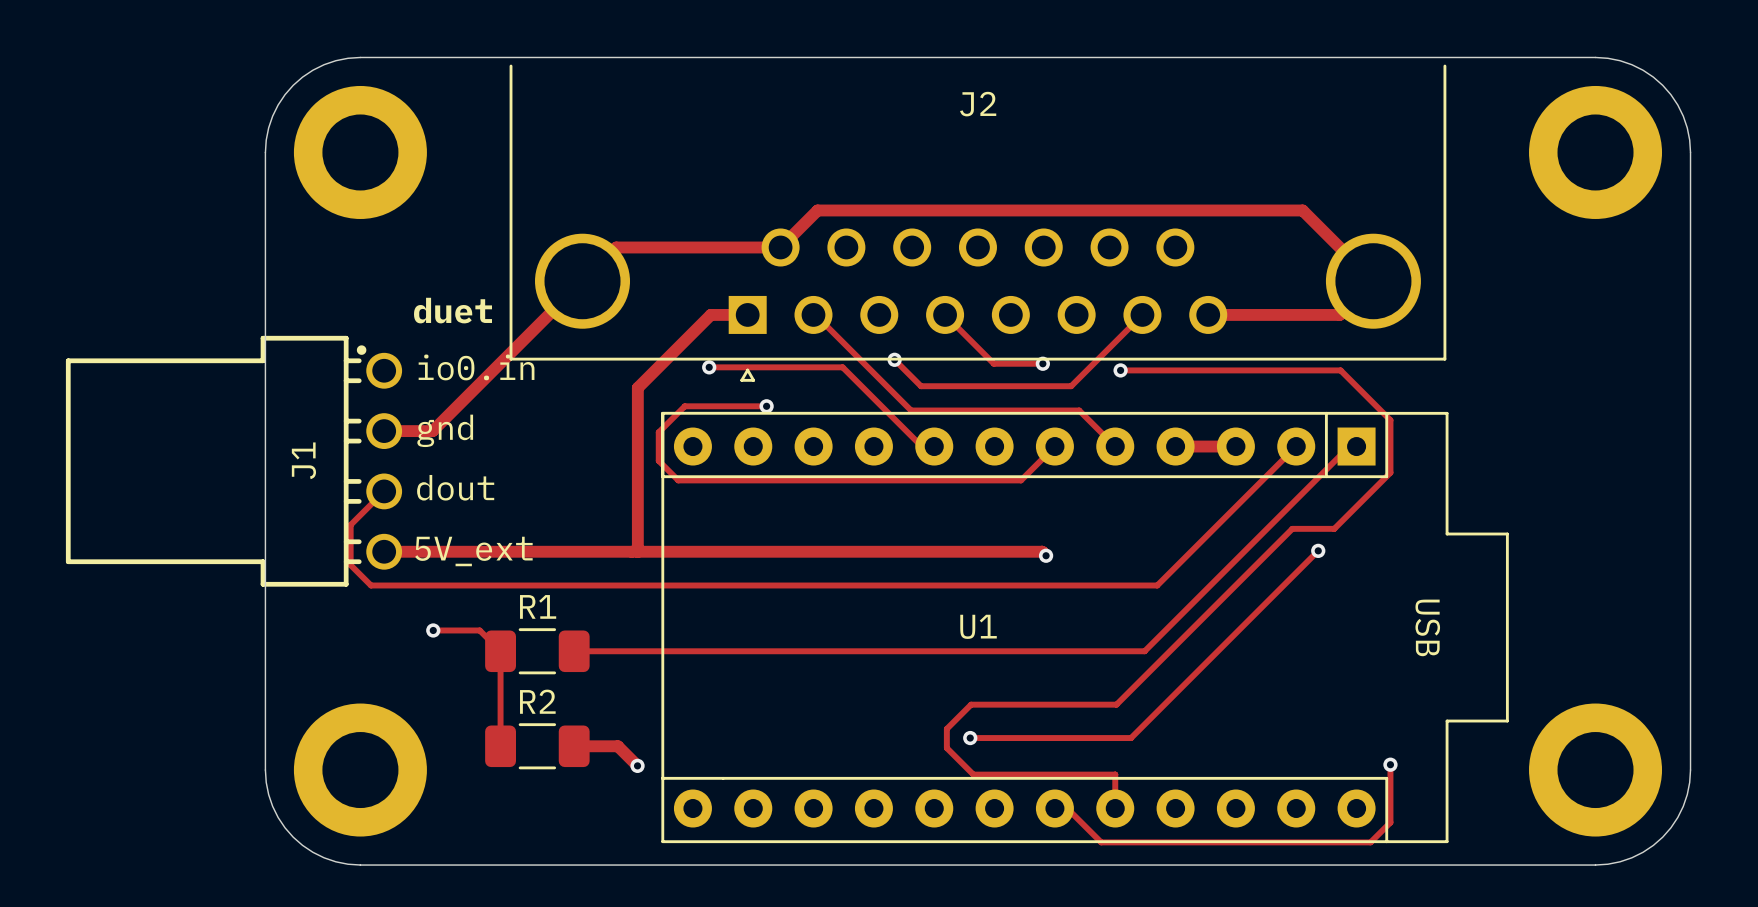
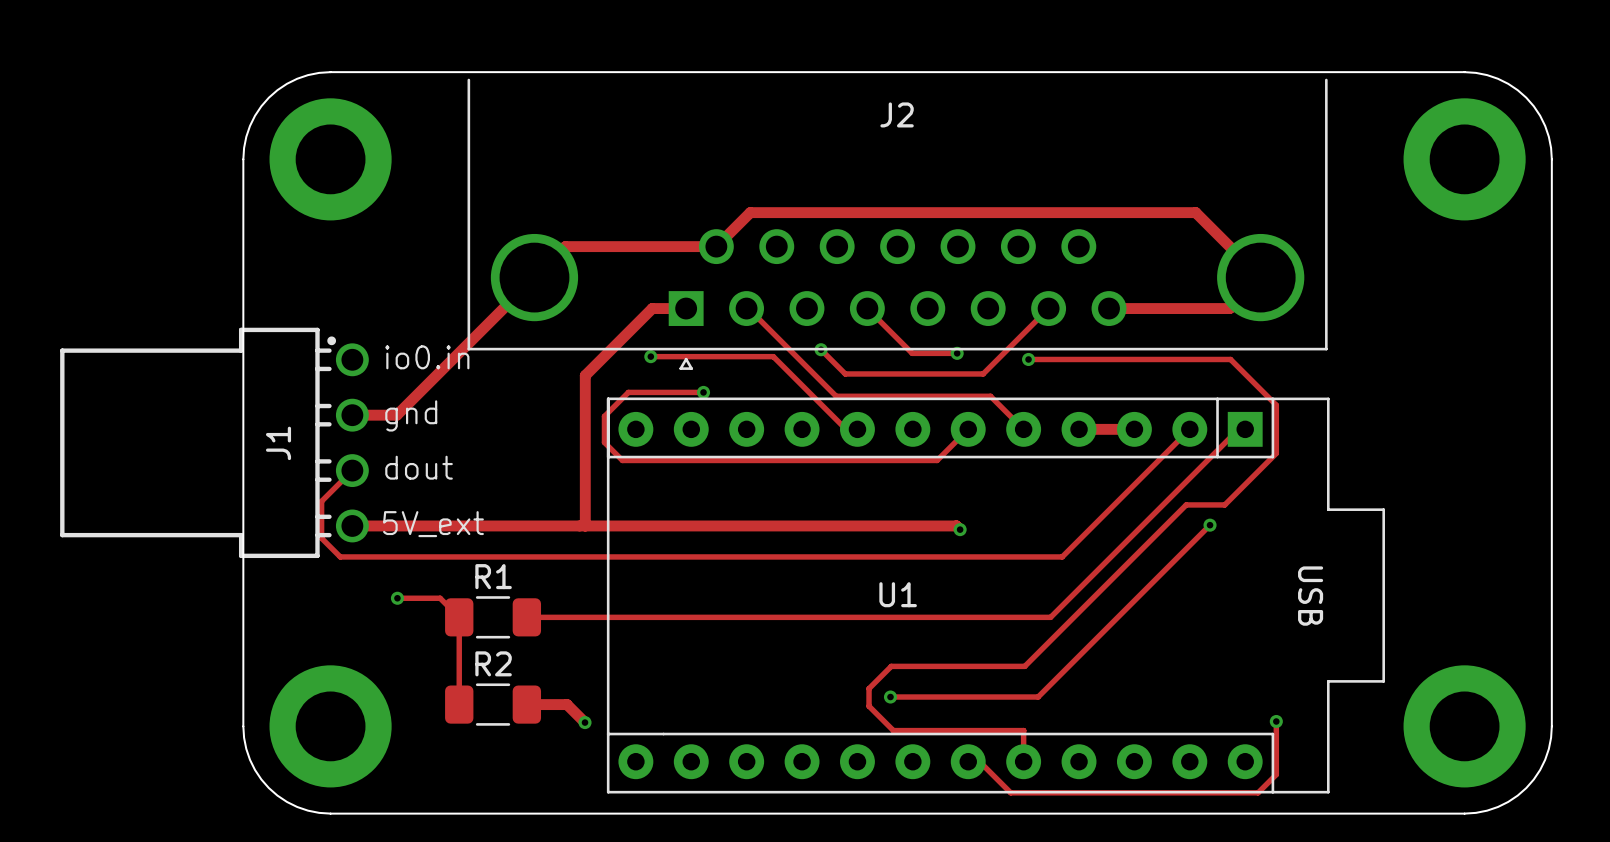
text: duet (453, 310) -> none

